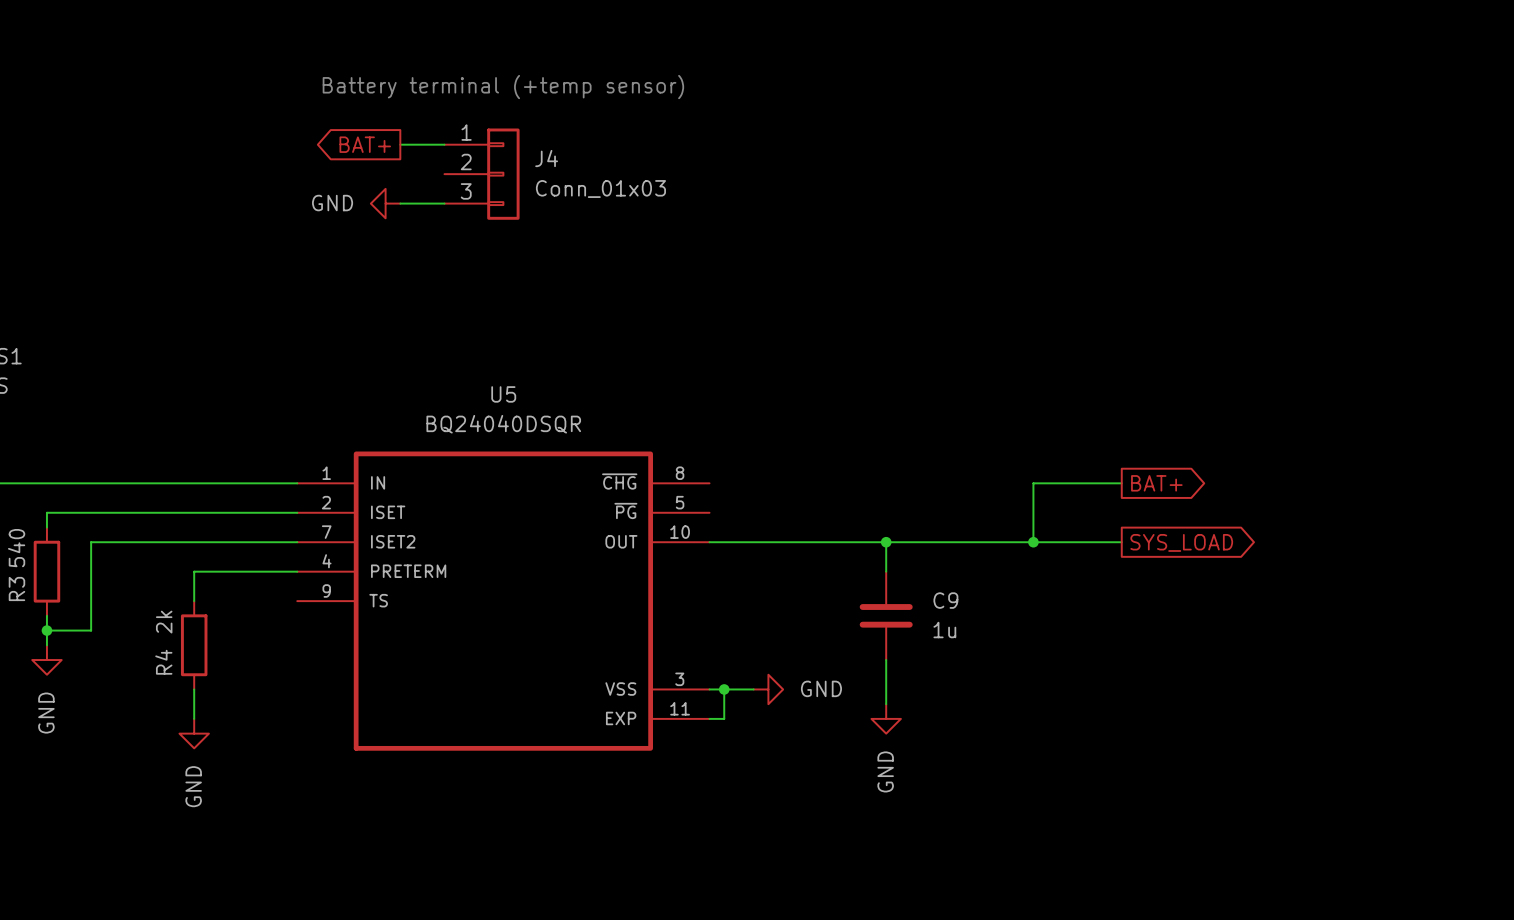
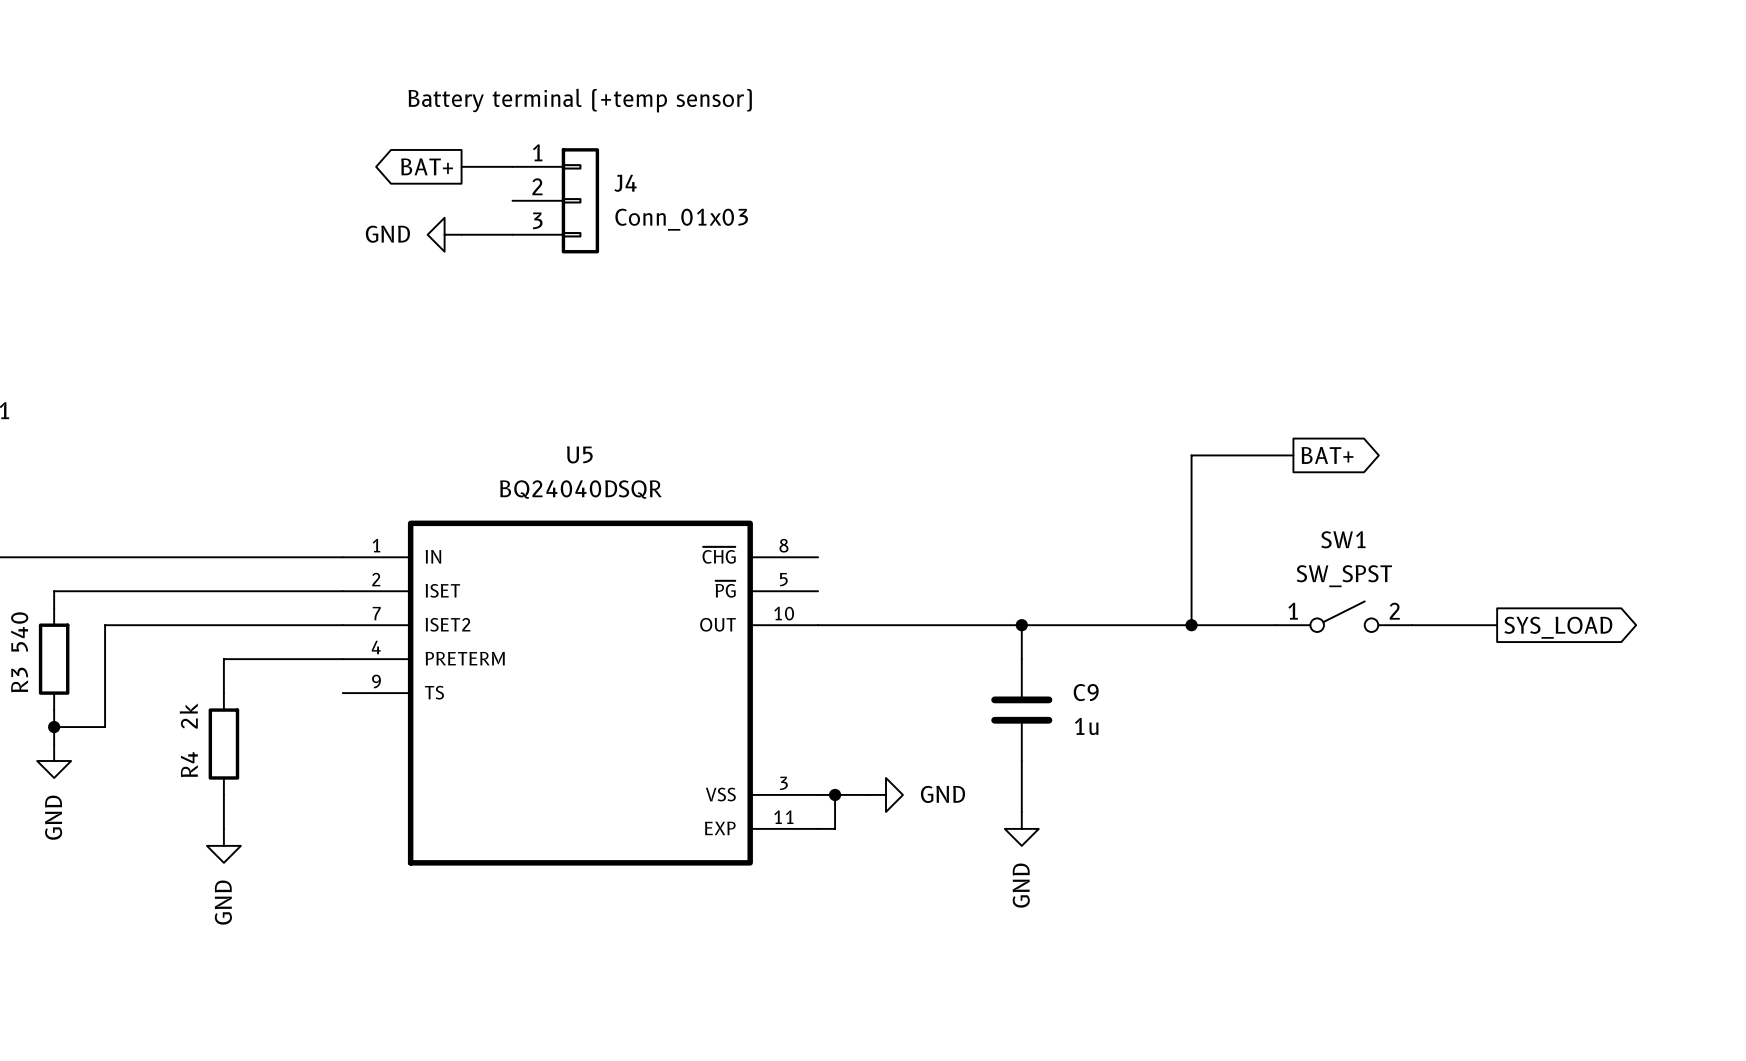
wire: (1033, 483) (1121, 483) -> (1191, 557) (1191, 455) (1293, 455)
global label position: BAT+ (1156, 483) -> BAT+ (1327, 455)
SW1: none -> SW_SPST (1344, 616)
global label position: SYS_LOAD (1181, 542) -> SYS_LOAD (1558, 627)
wire: none -> (1412, 625) (1497, 625)

